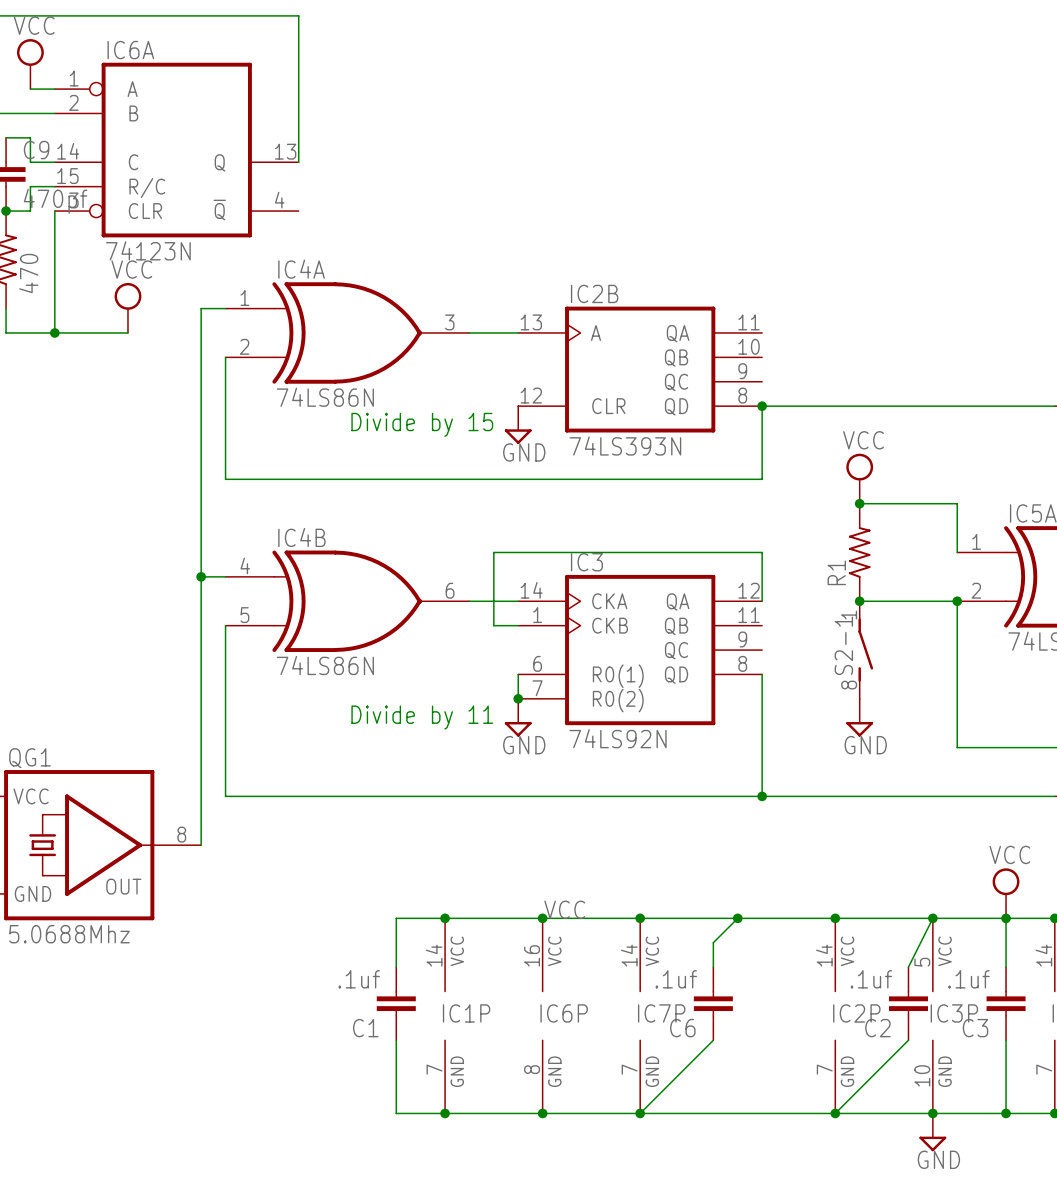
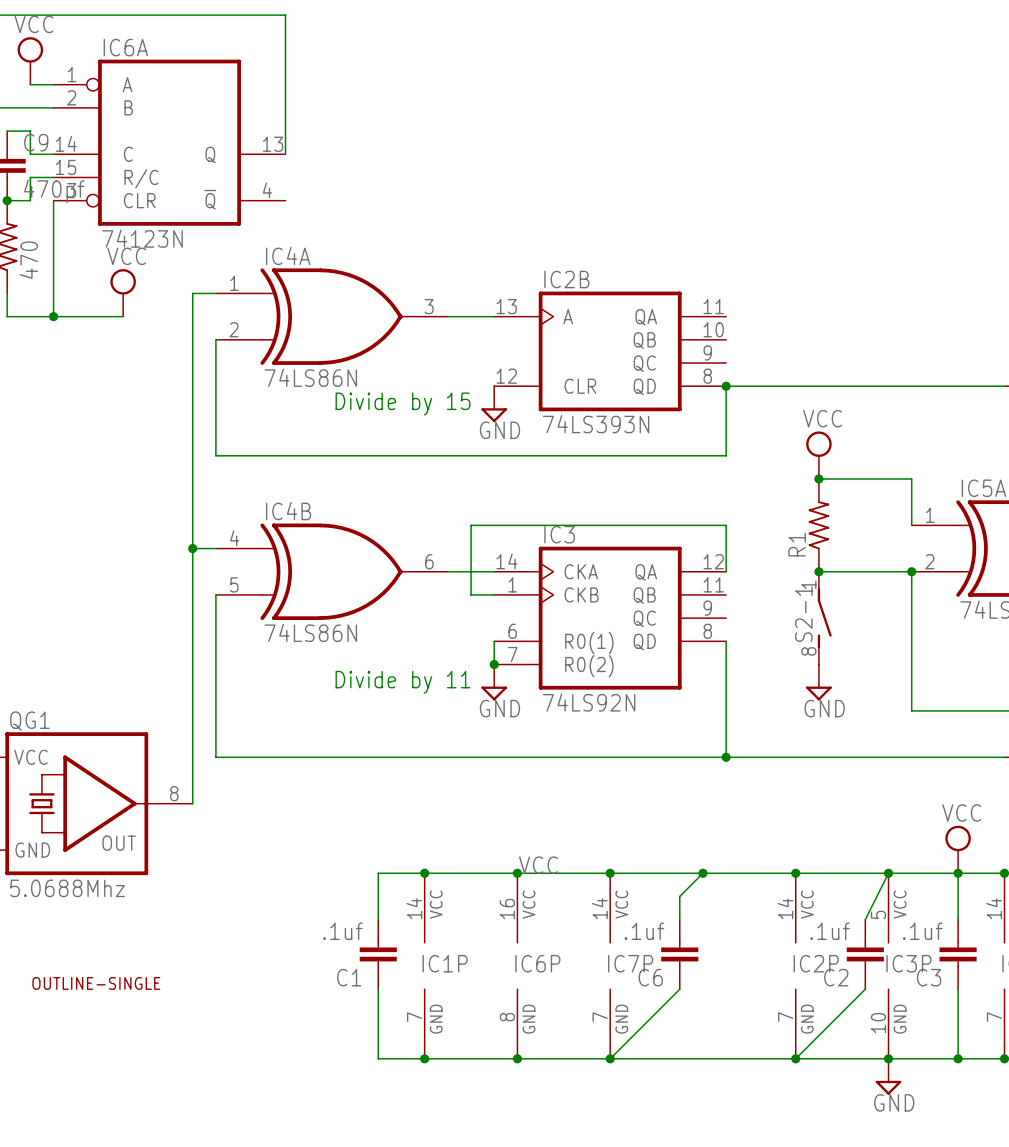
part: none -> OUTLINE-SINGLE (96, 983)

